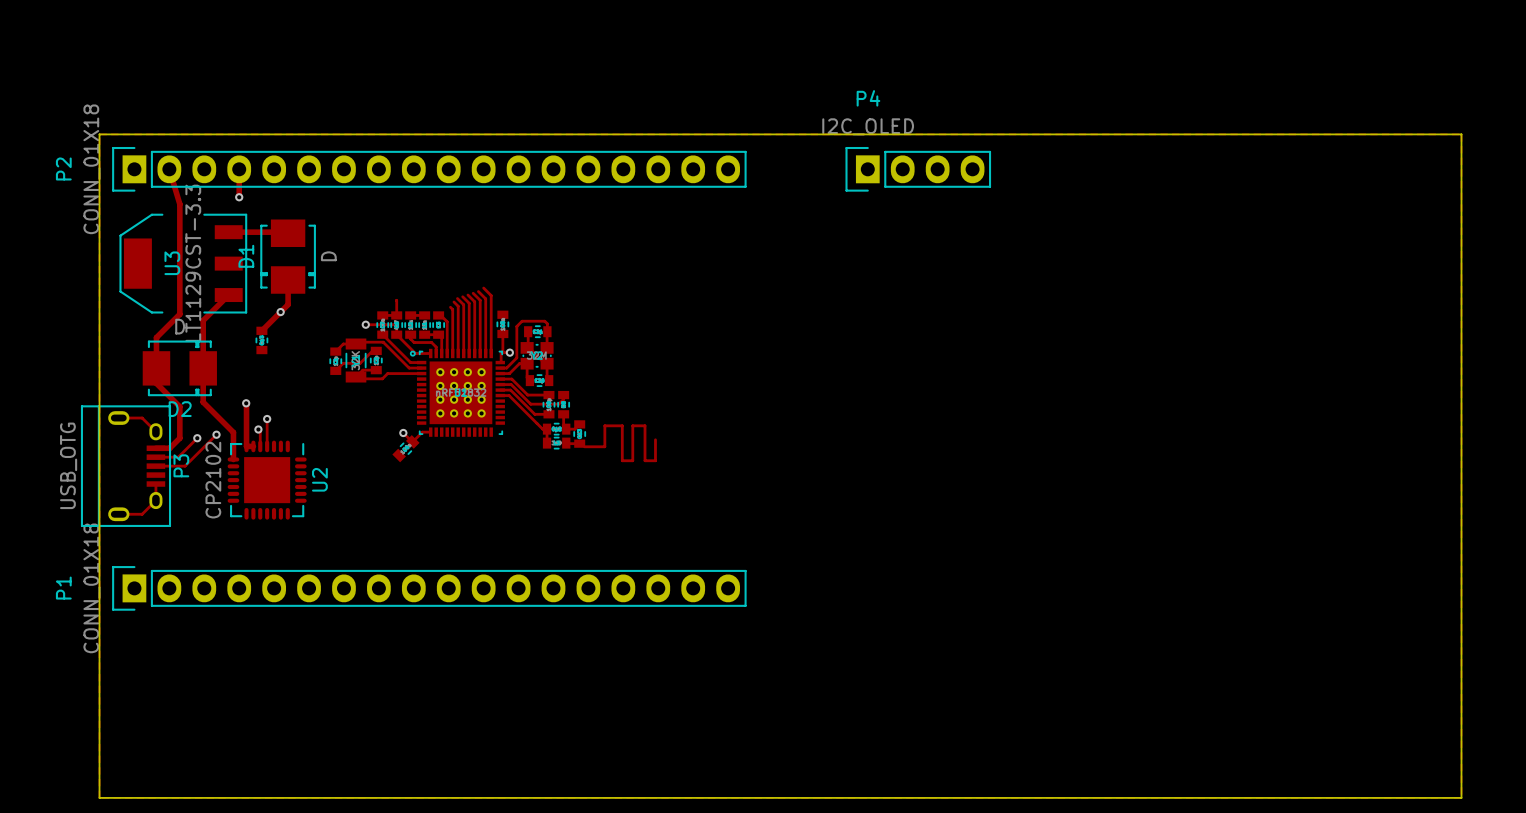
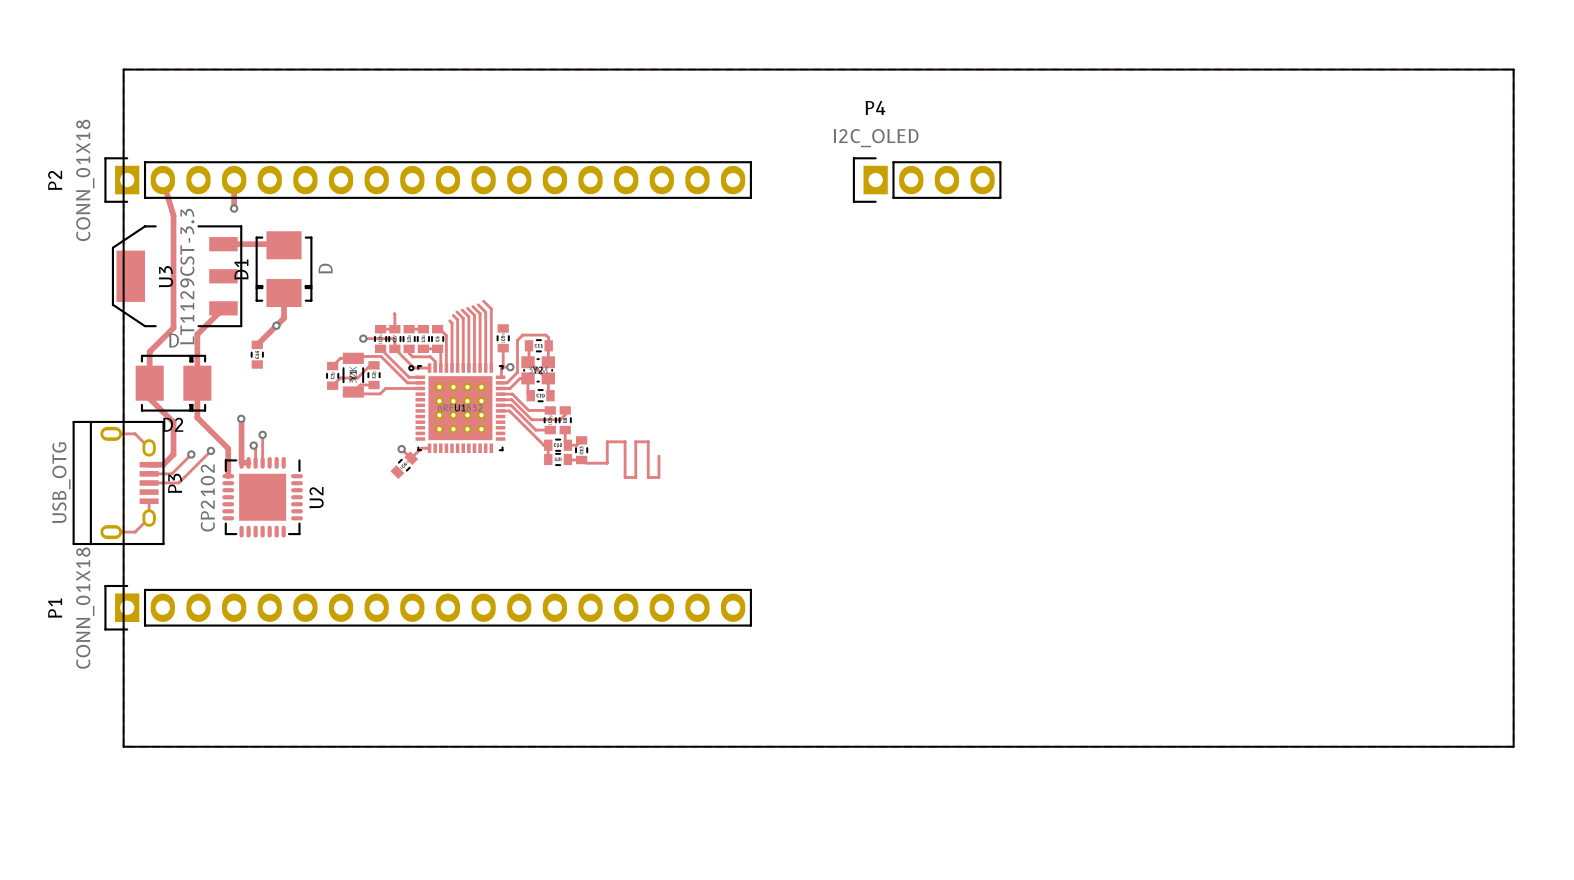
board edge: (99, 134) (99, 797) (1461, 797) (1461, 134) (99, 134) -> (123, 69) (123, 746) (1513, 746) (1513, 69) (123, 69)

